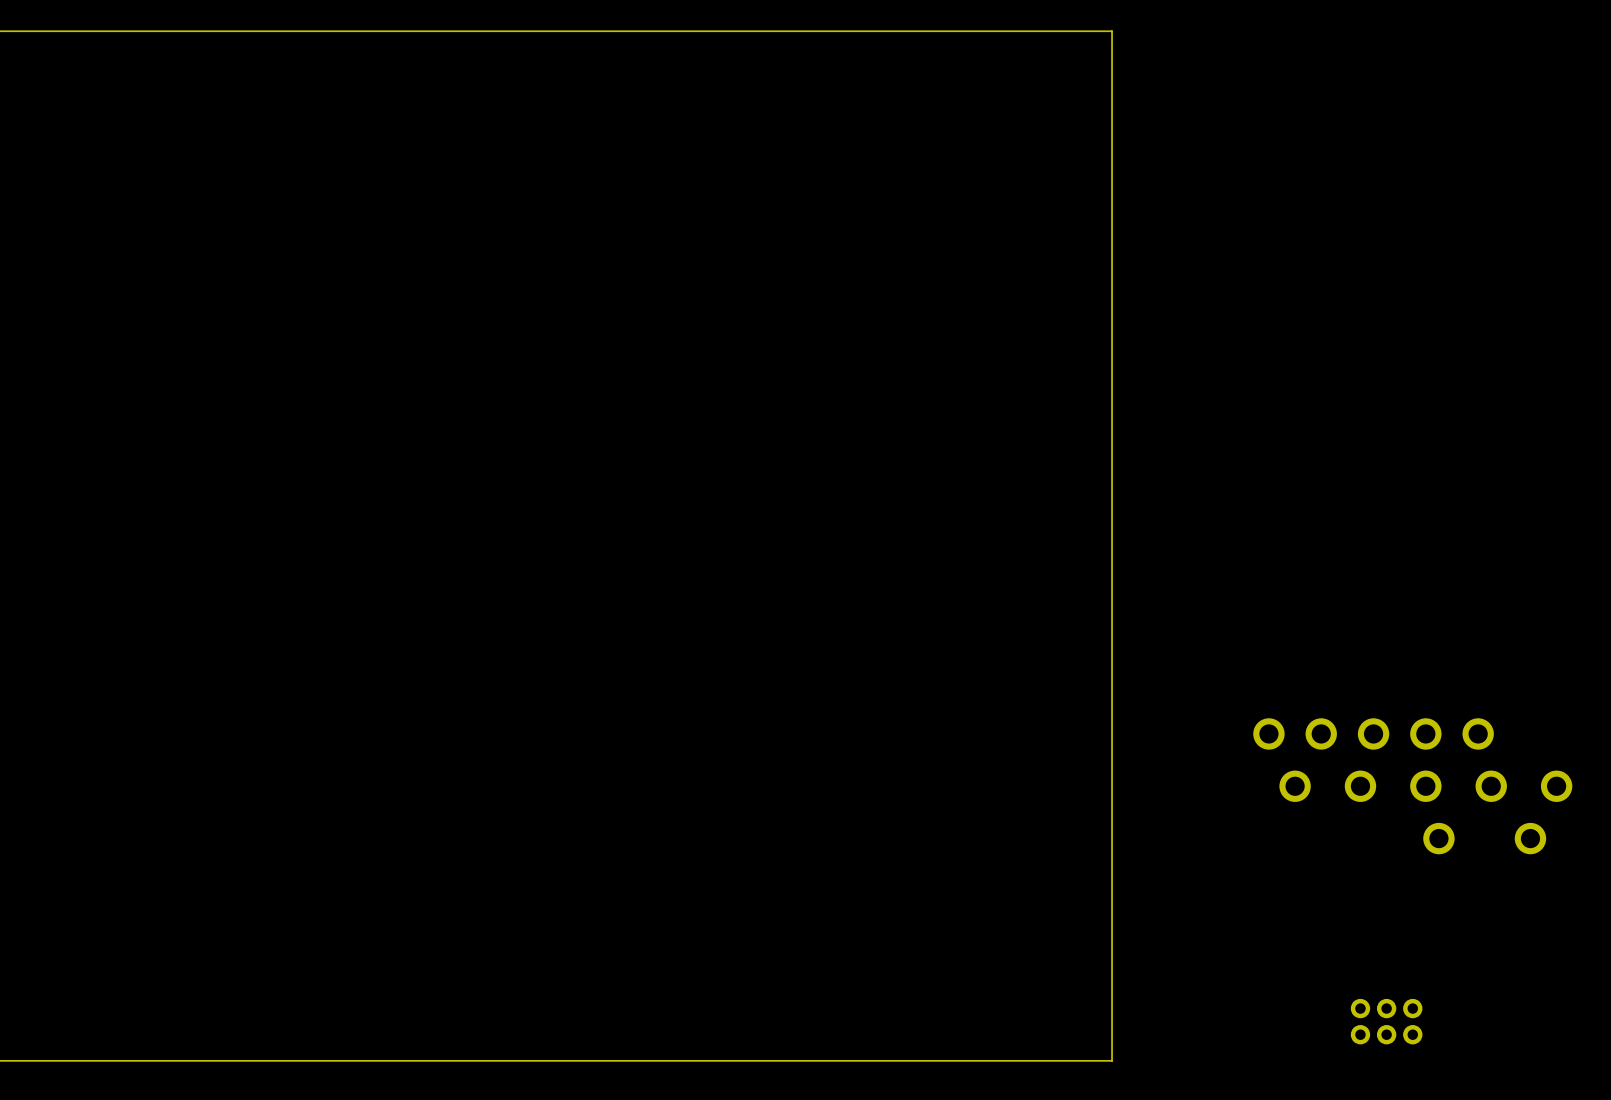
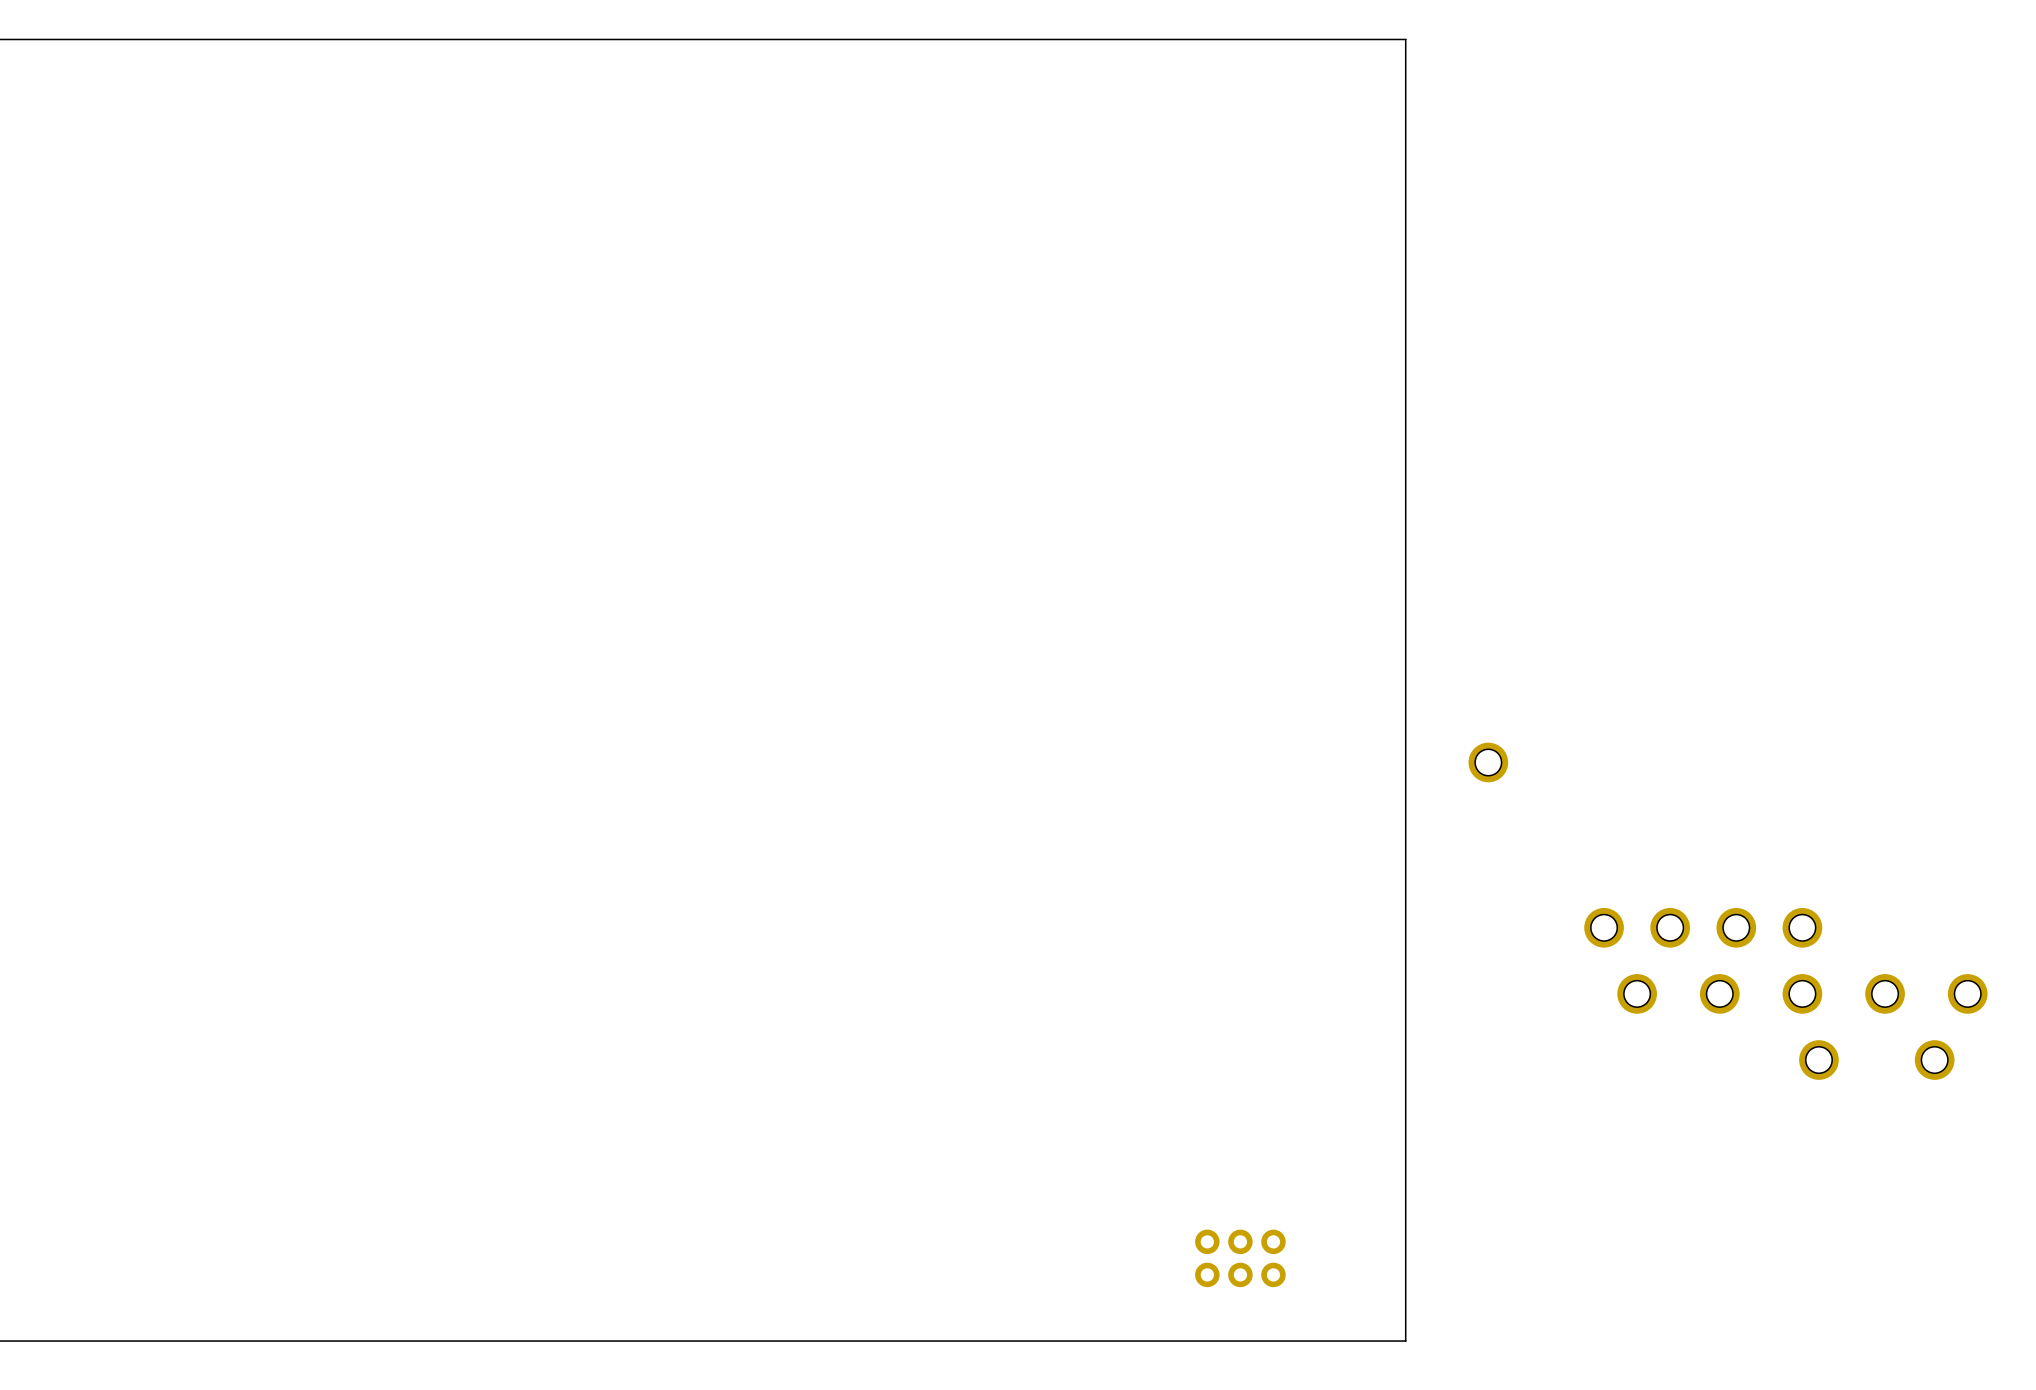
part: none -> (1488, 762)
part: (1478, 733) -> none
part: none -> (1240, 1258)
part: (1386, 1021) -> none

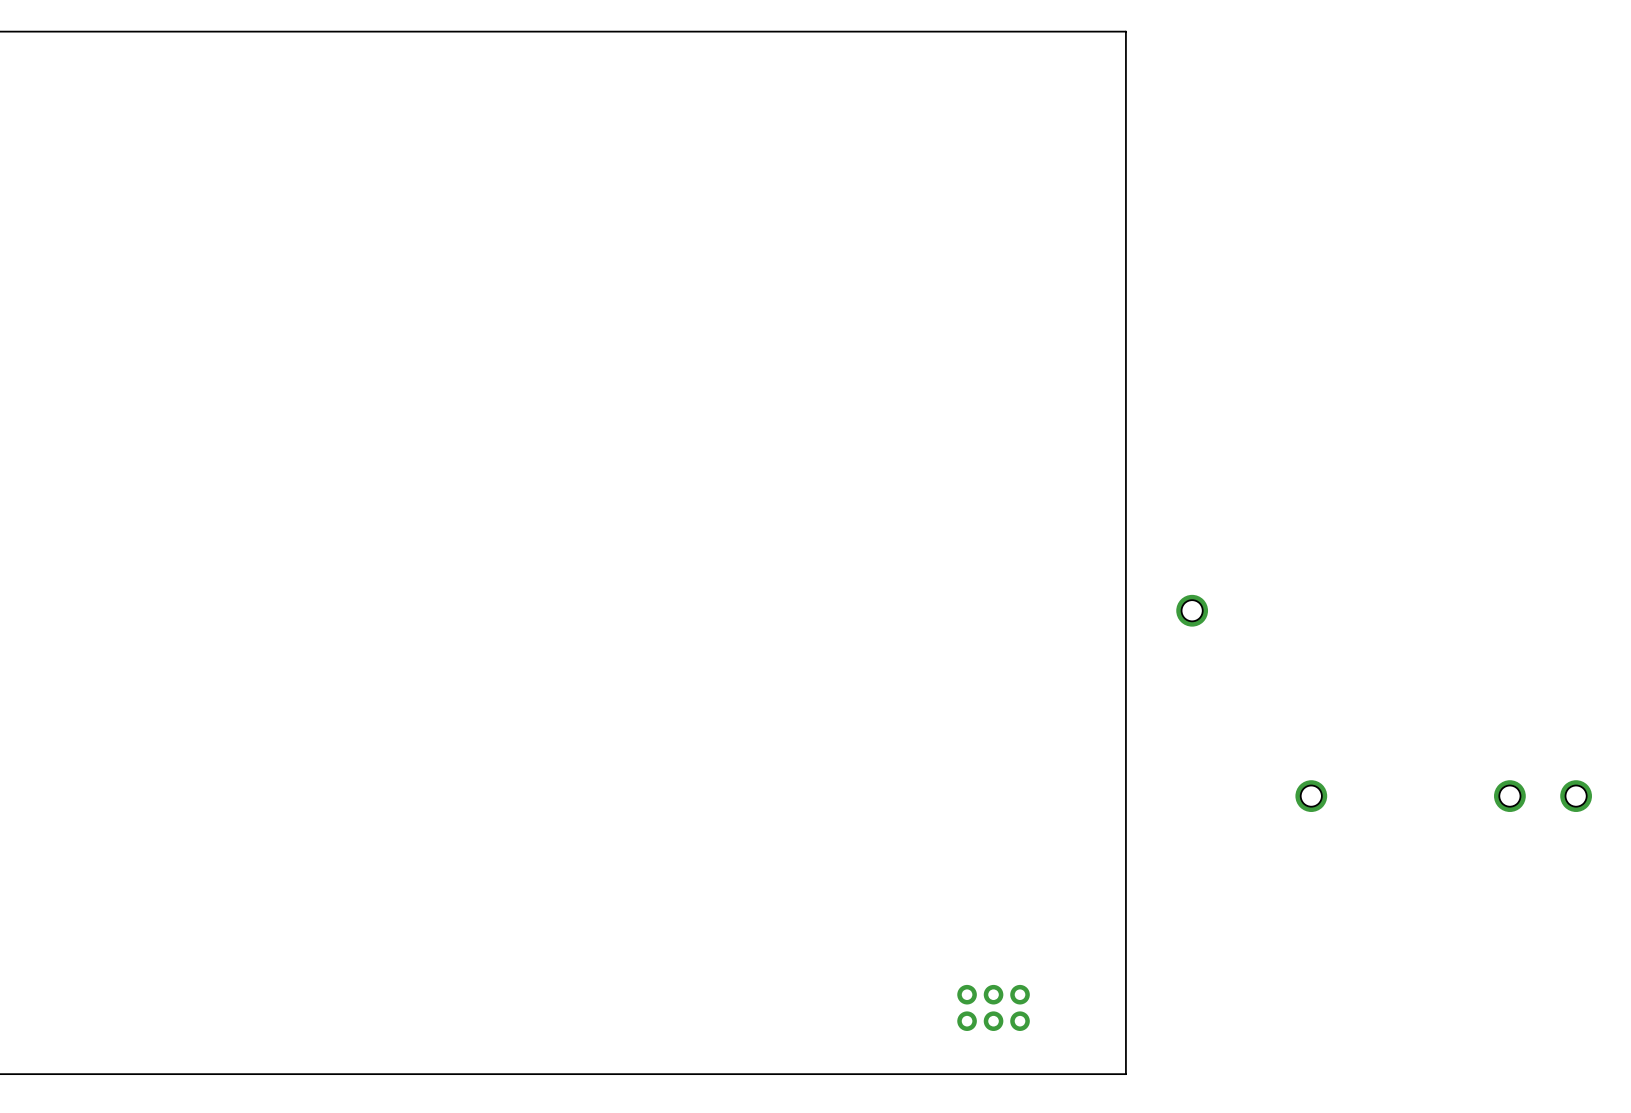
part: (1604, 927) -> none
part: (1670, 927) -> none
part: (1736, 927) -> none
part: (1802, 927) -> none
part: (1719, 993) -> none
part: (1802, 993) -> none
part: (1818, 1060) -> none
part: (1934, 1060) -> none

